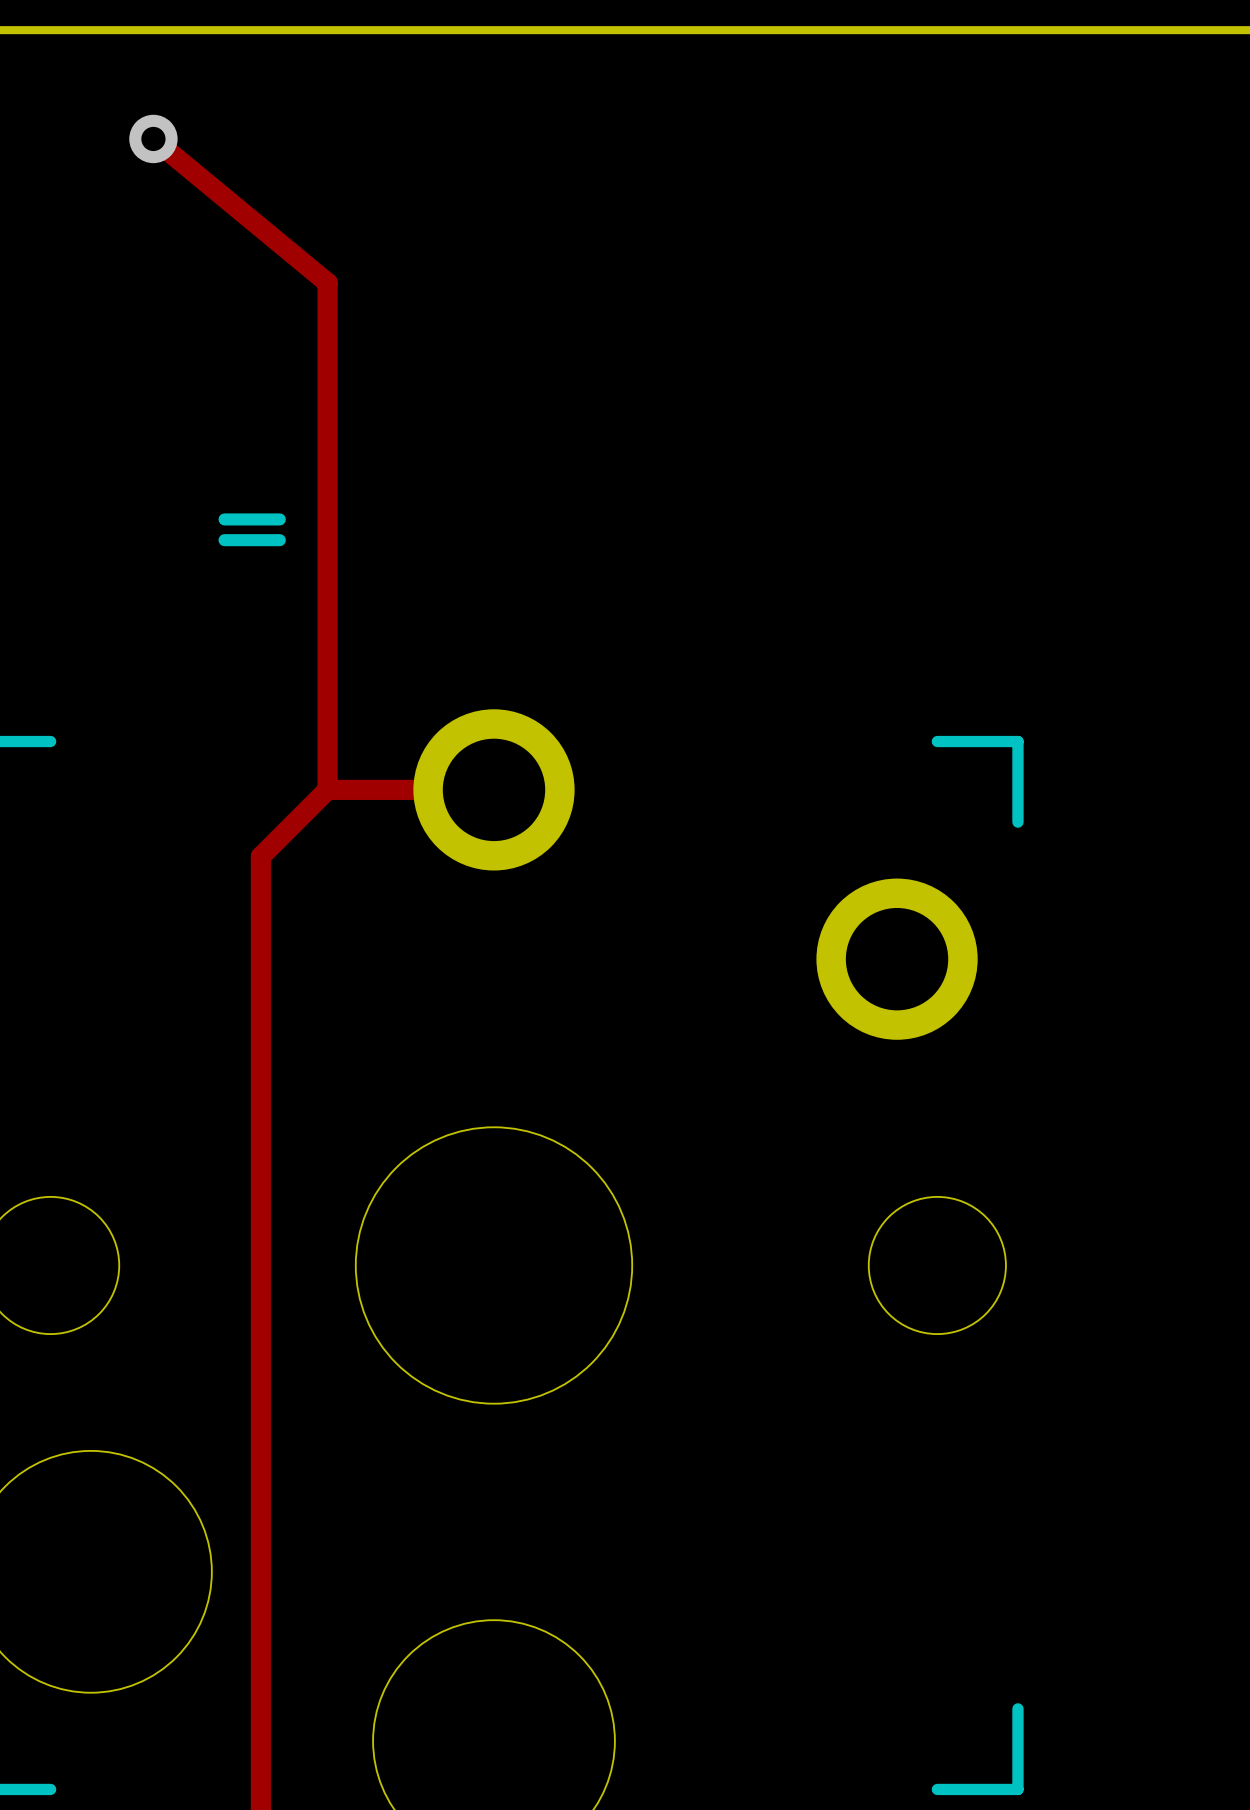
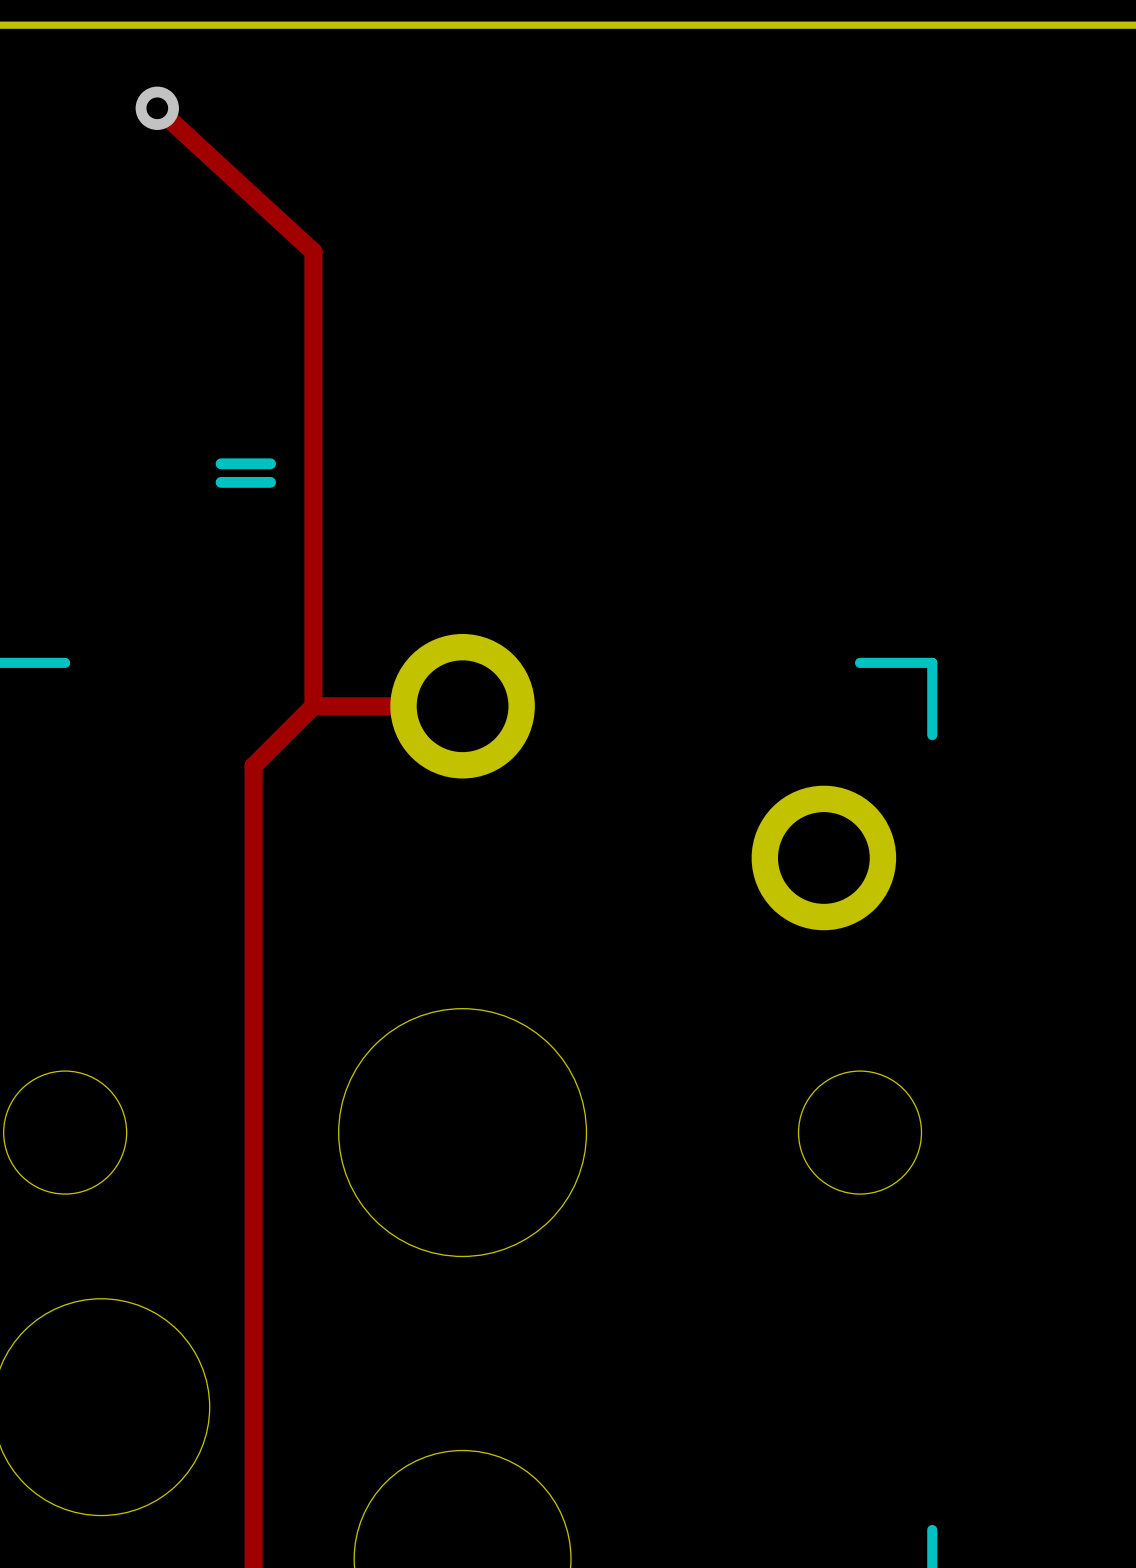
track: (153, 138) (327, 282) -> (157, 108) (313, 251)
via position: (153, 138) -> (157, 108)

